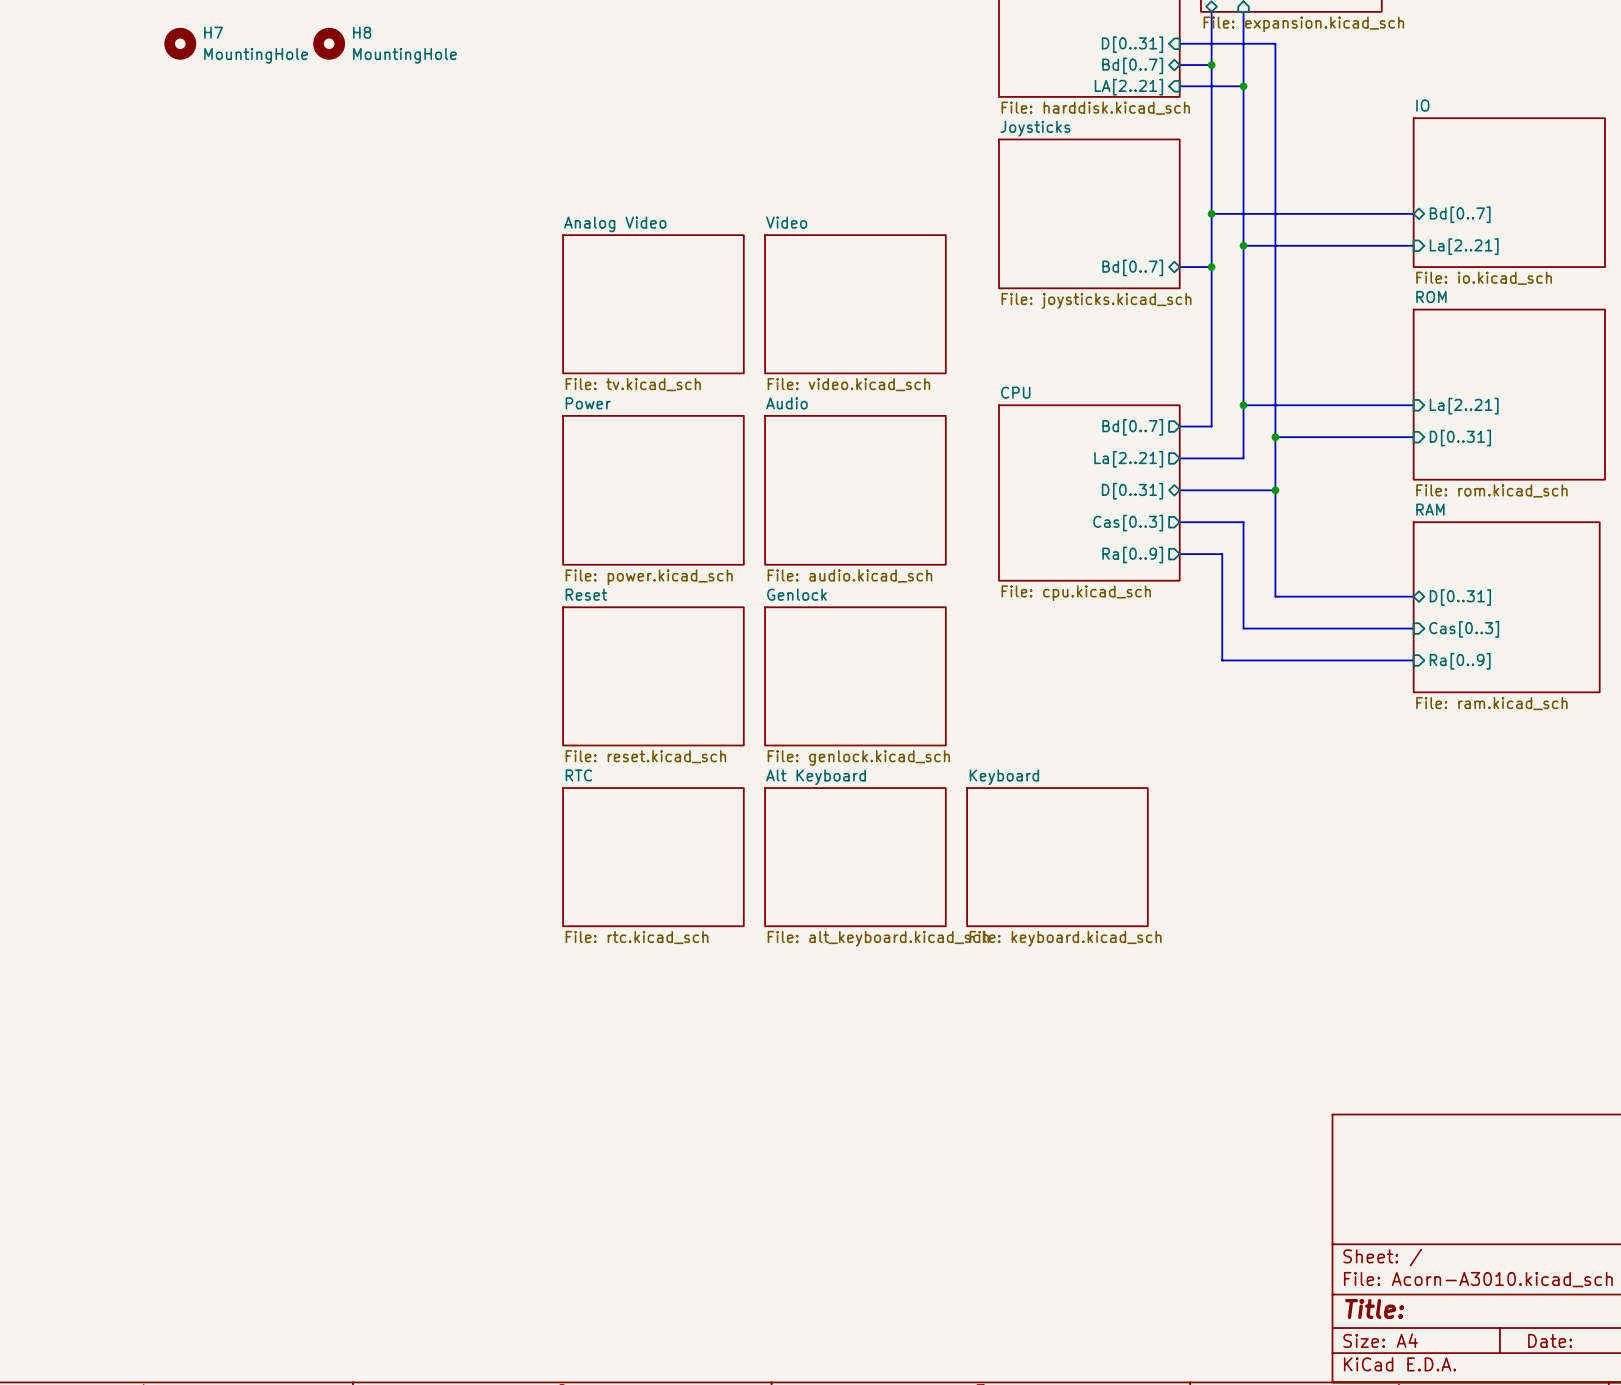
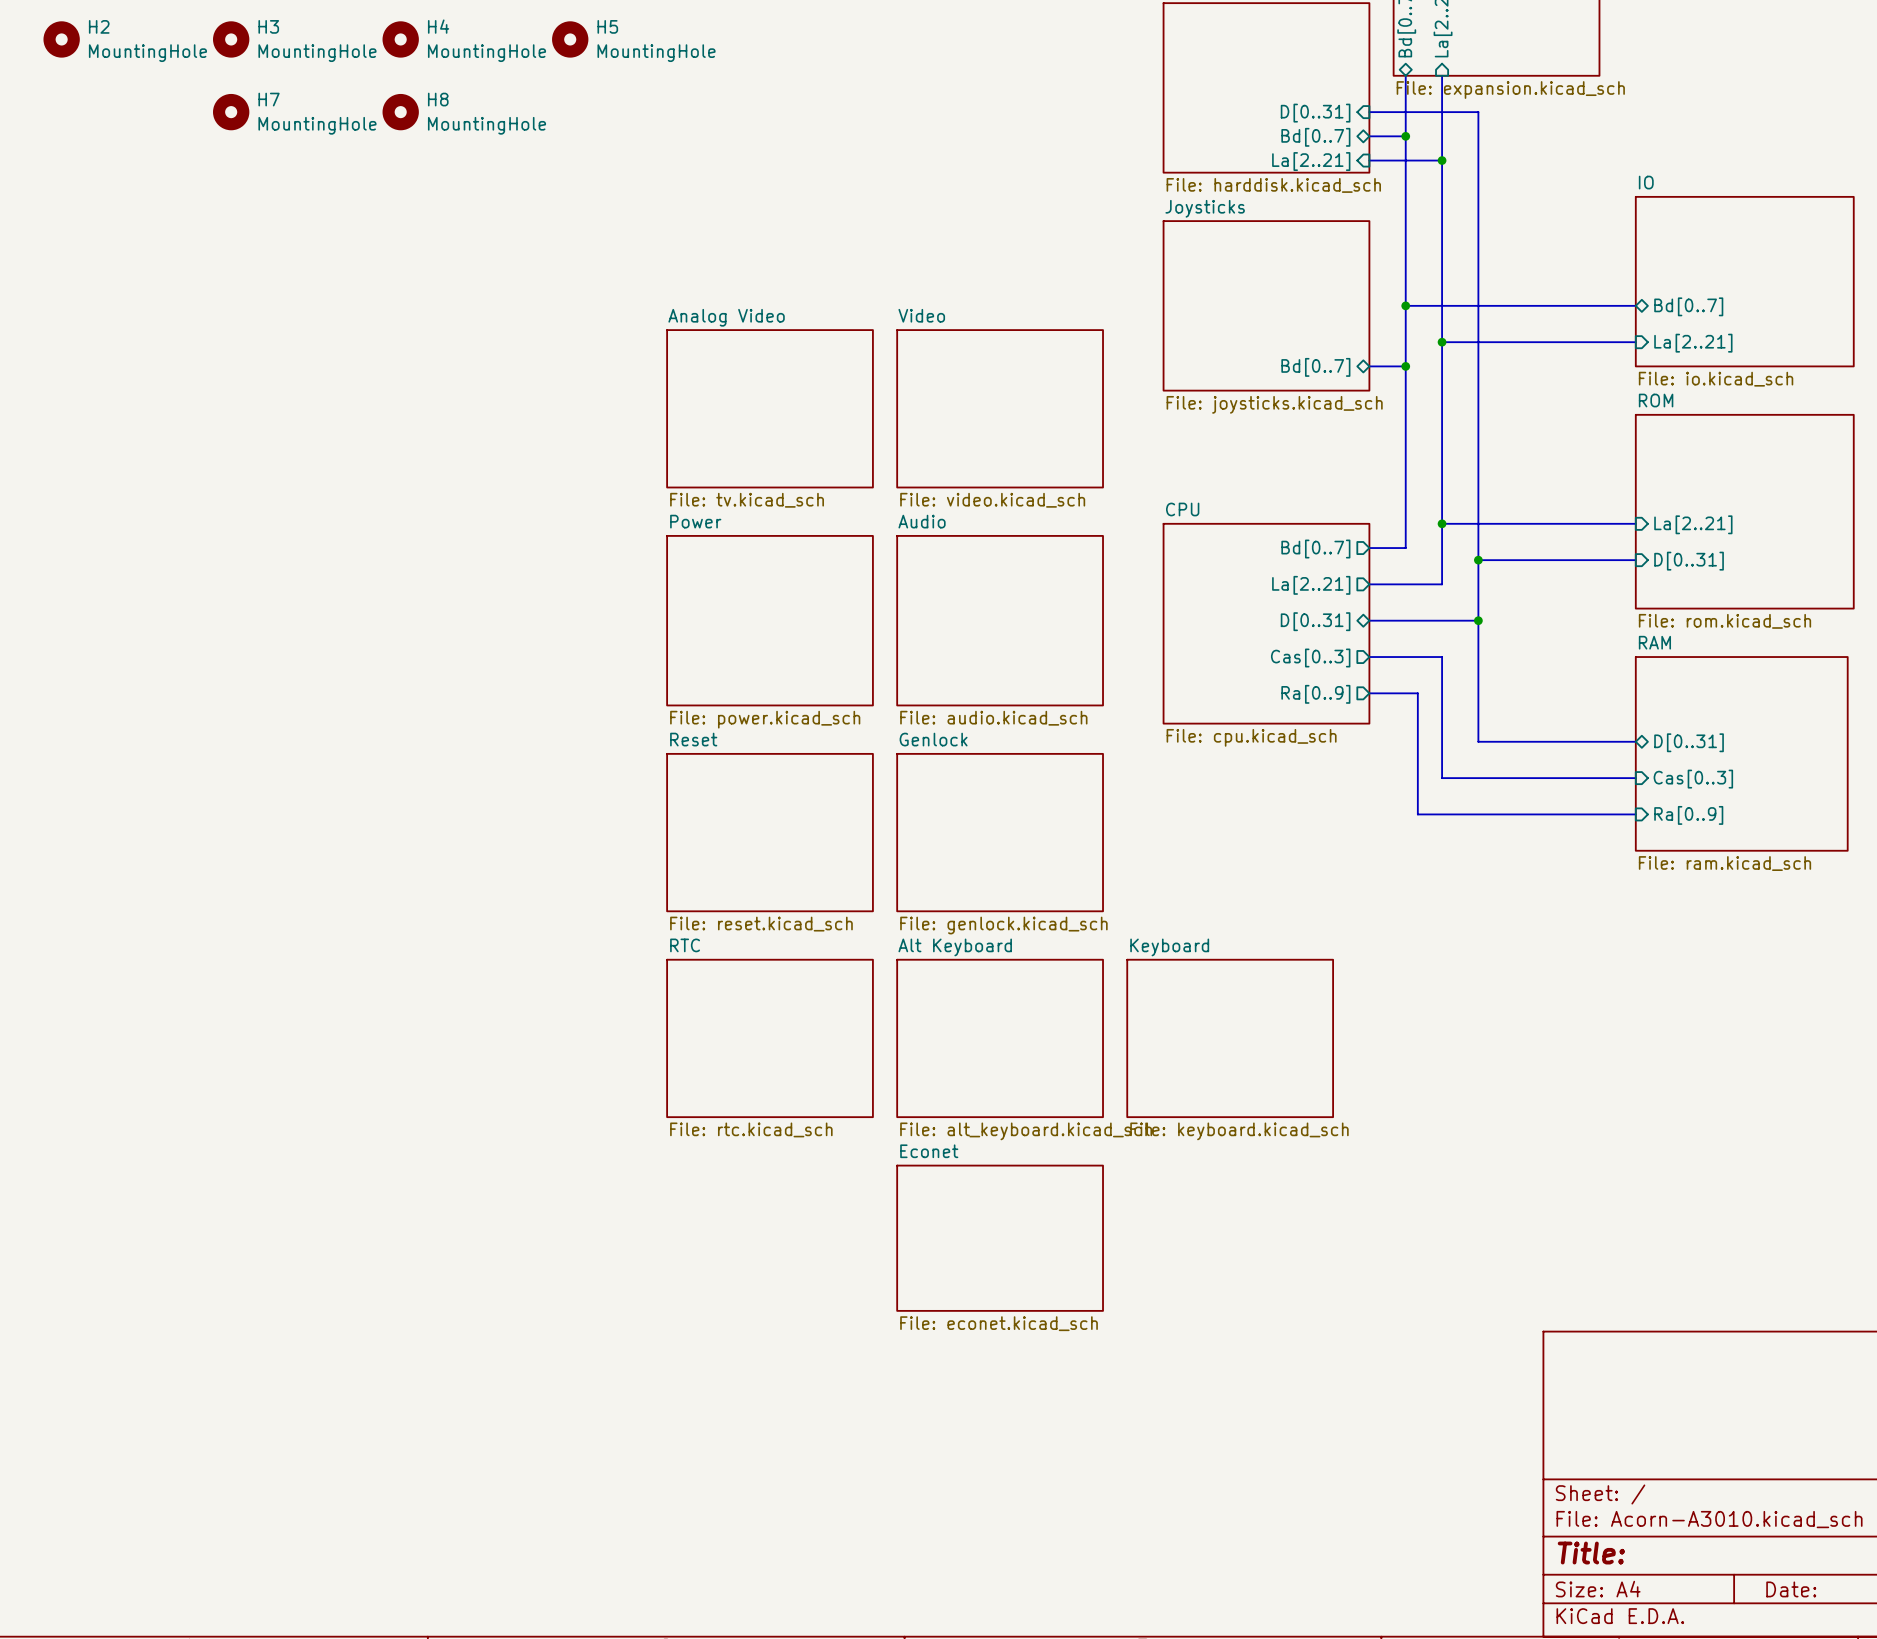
sheet pin: LA[2..21] (1128, 87) -> La[2..21] (1311, 161)
sheet Econet: none -> File: econet.kicad_sch (1000, 1238)

